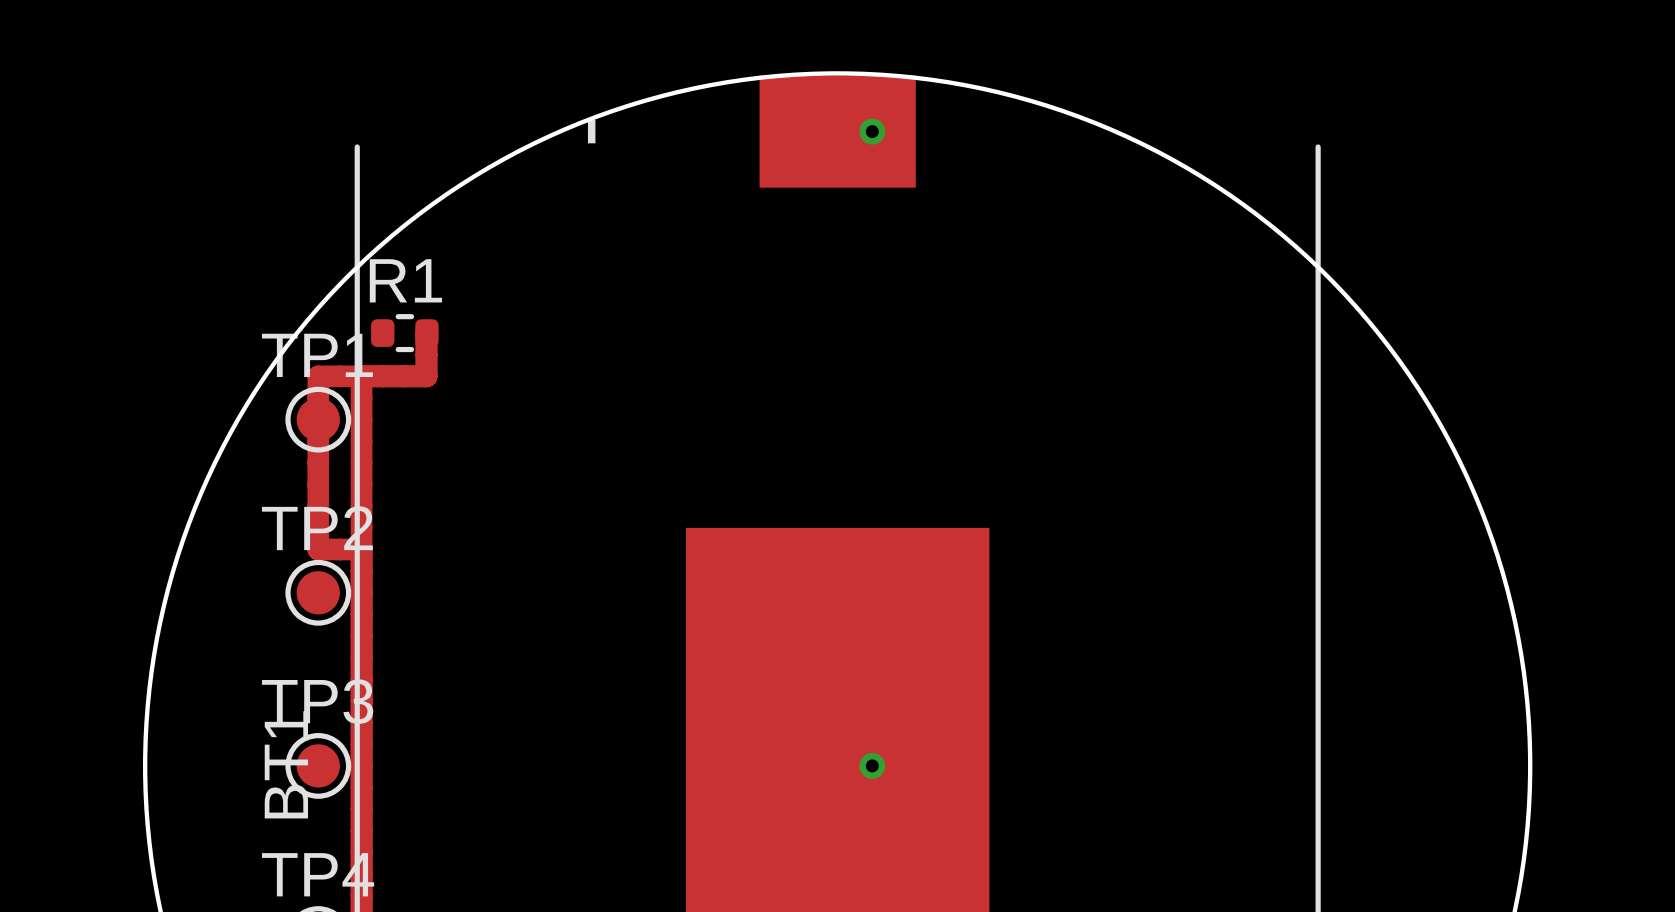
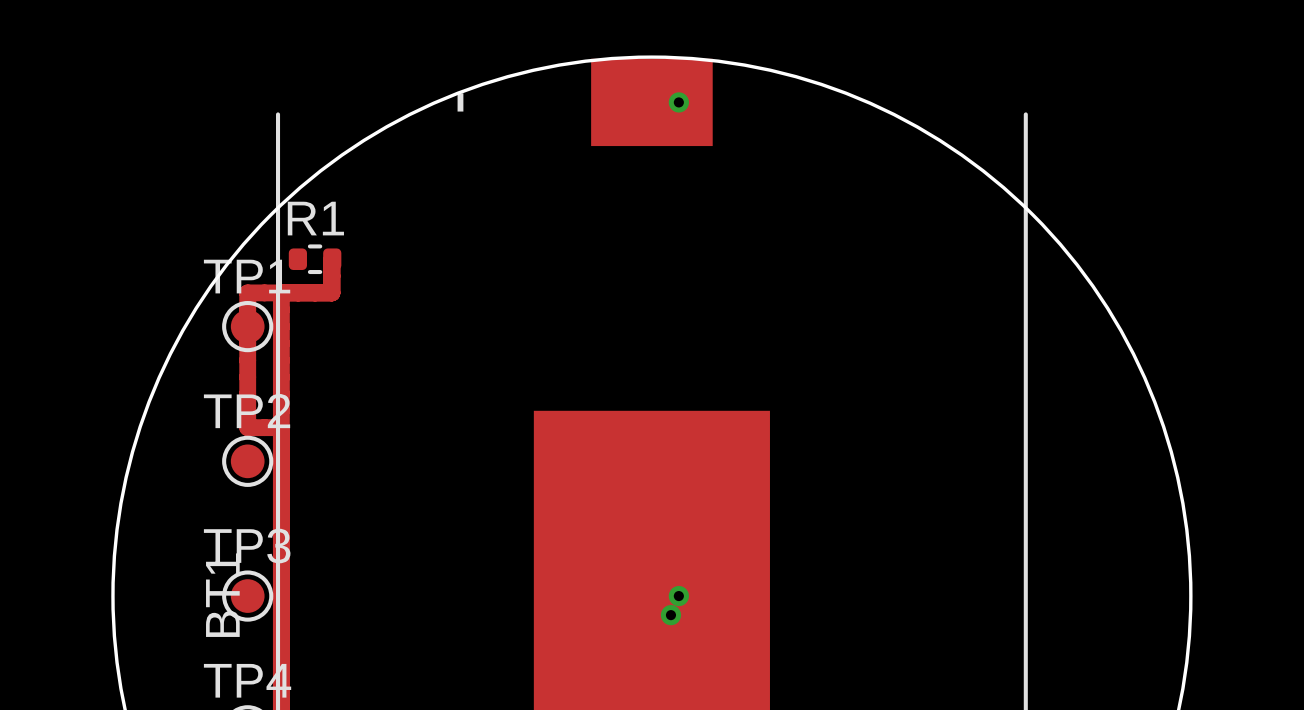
via: none -> (670, 615)

